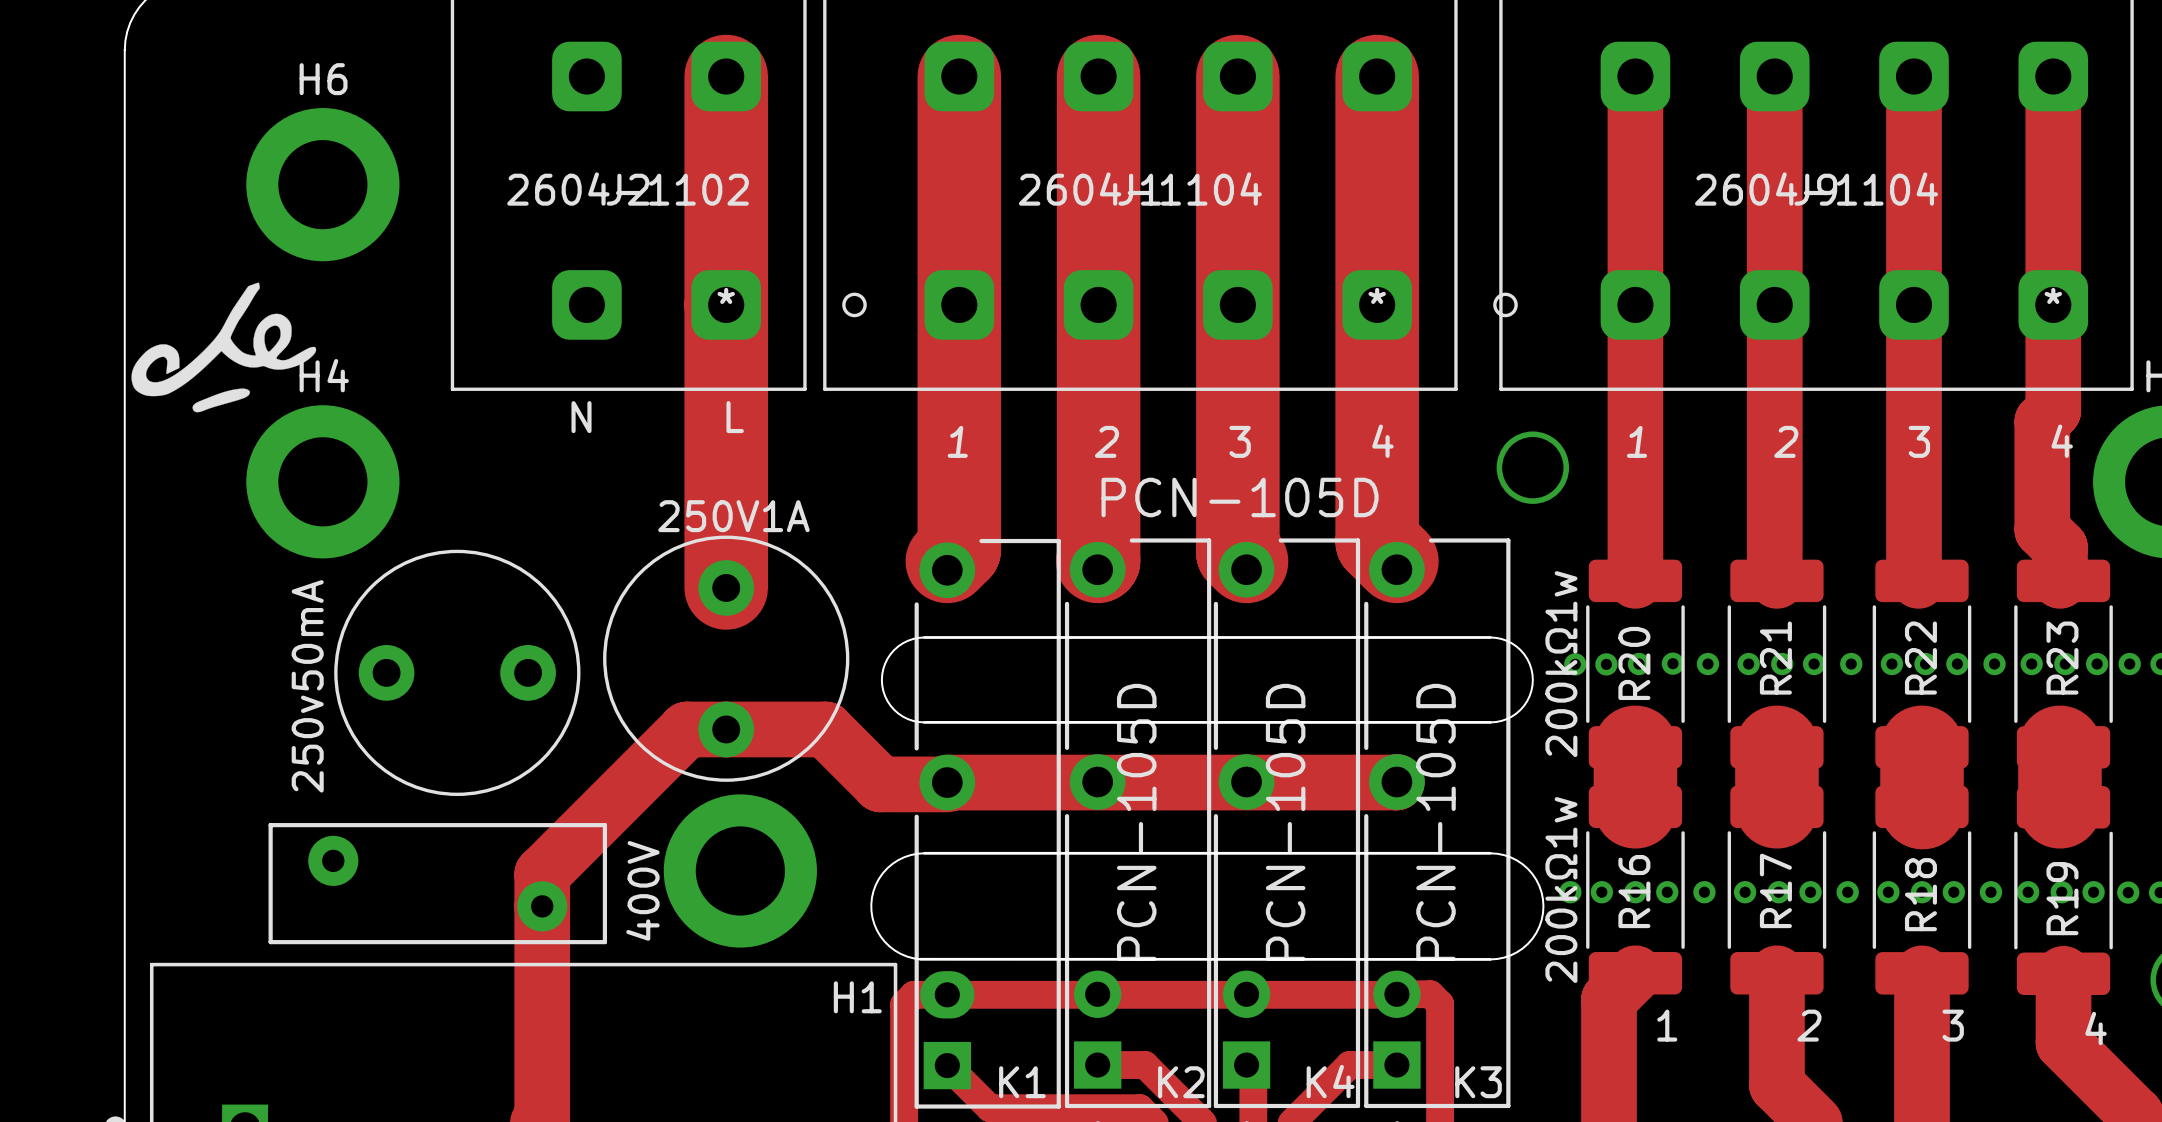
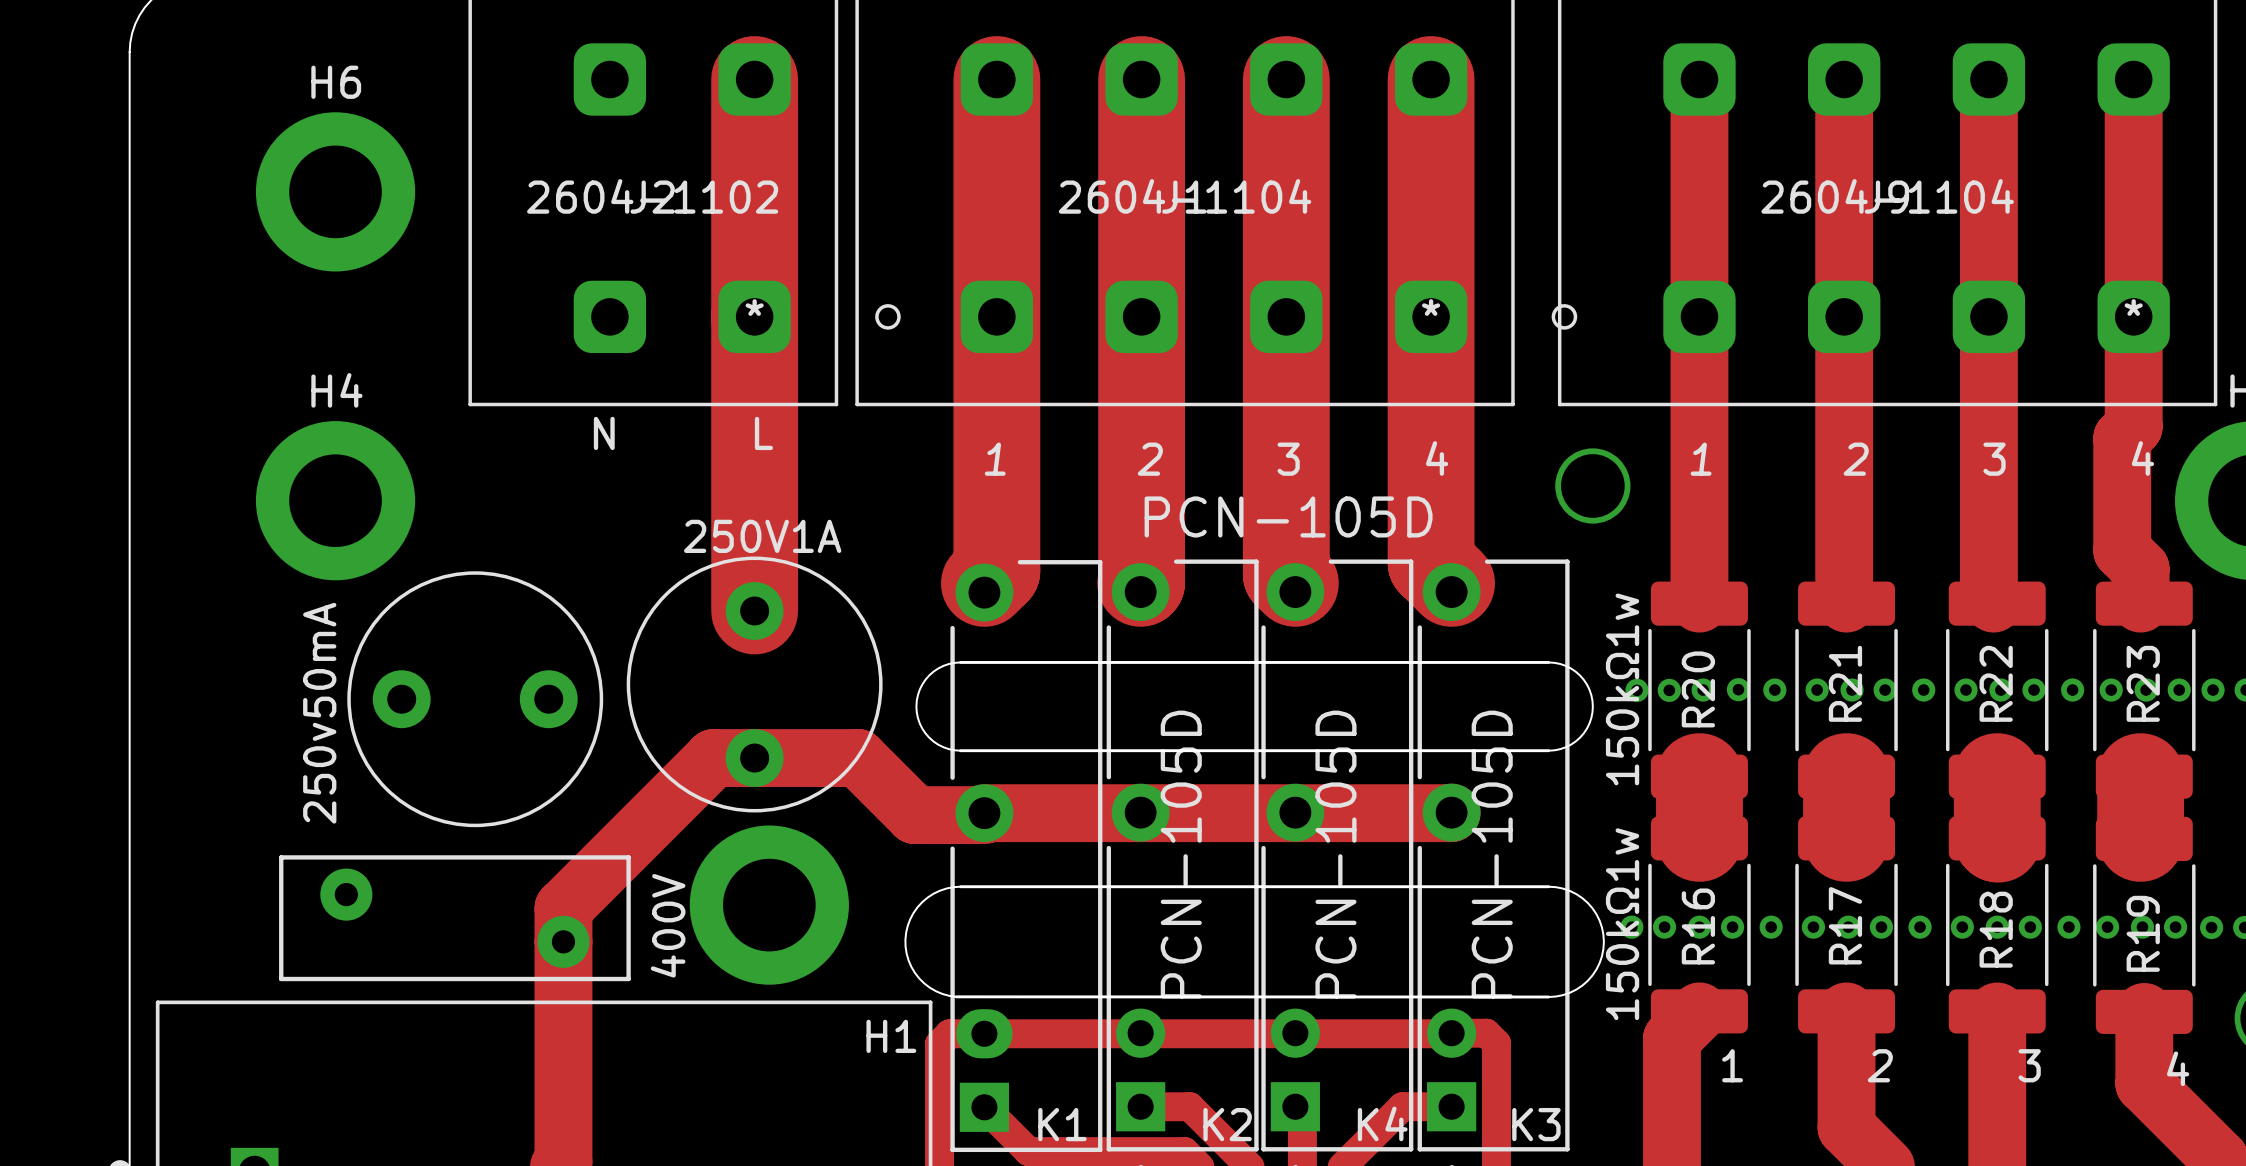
drawing: [131, 282, 317, 413] -> none
R20 value: 200kΩ1w (1561, 664) -> 150kΩ1w (1622, 689)
R16 value: 200kΩ1w (1561, 890) -> 150kΩ1w (1622, 924)

